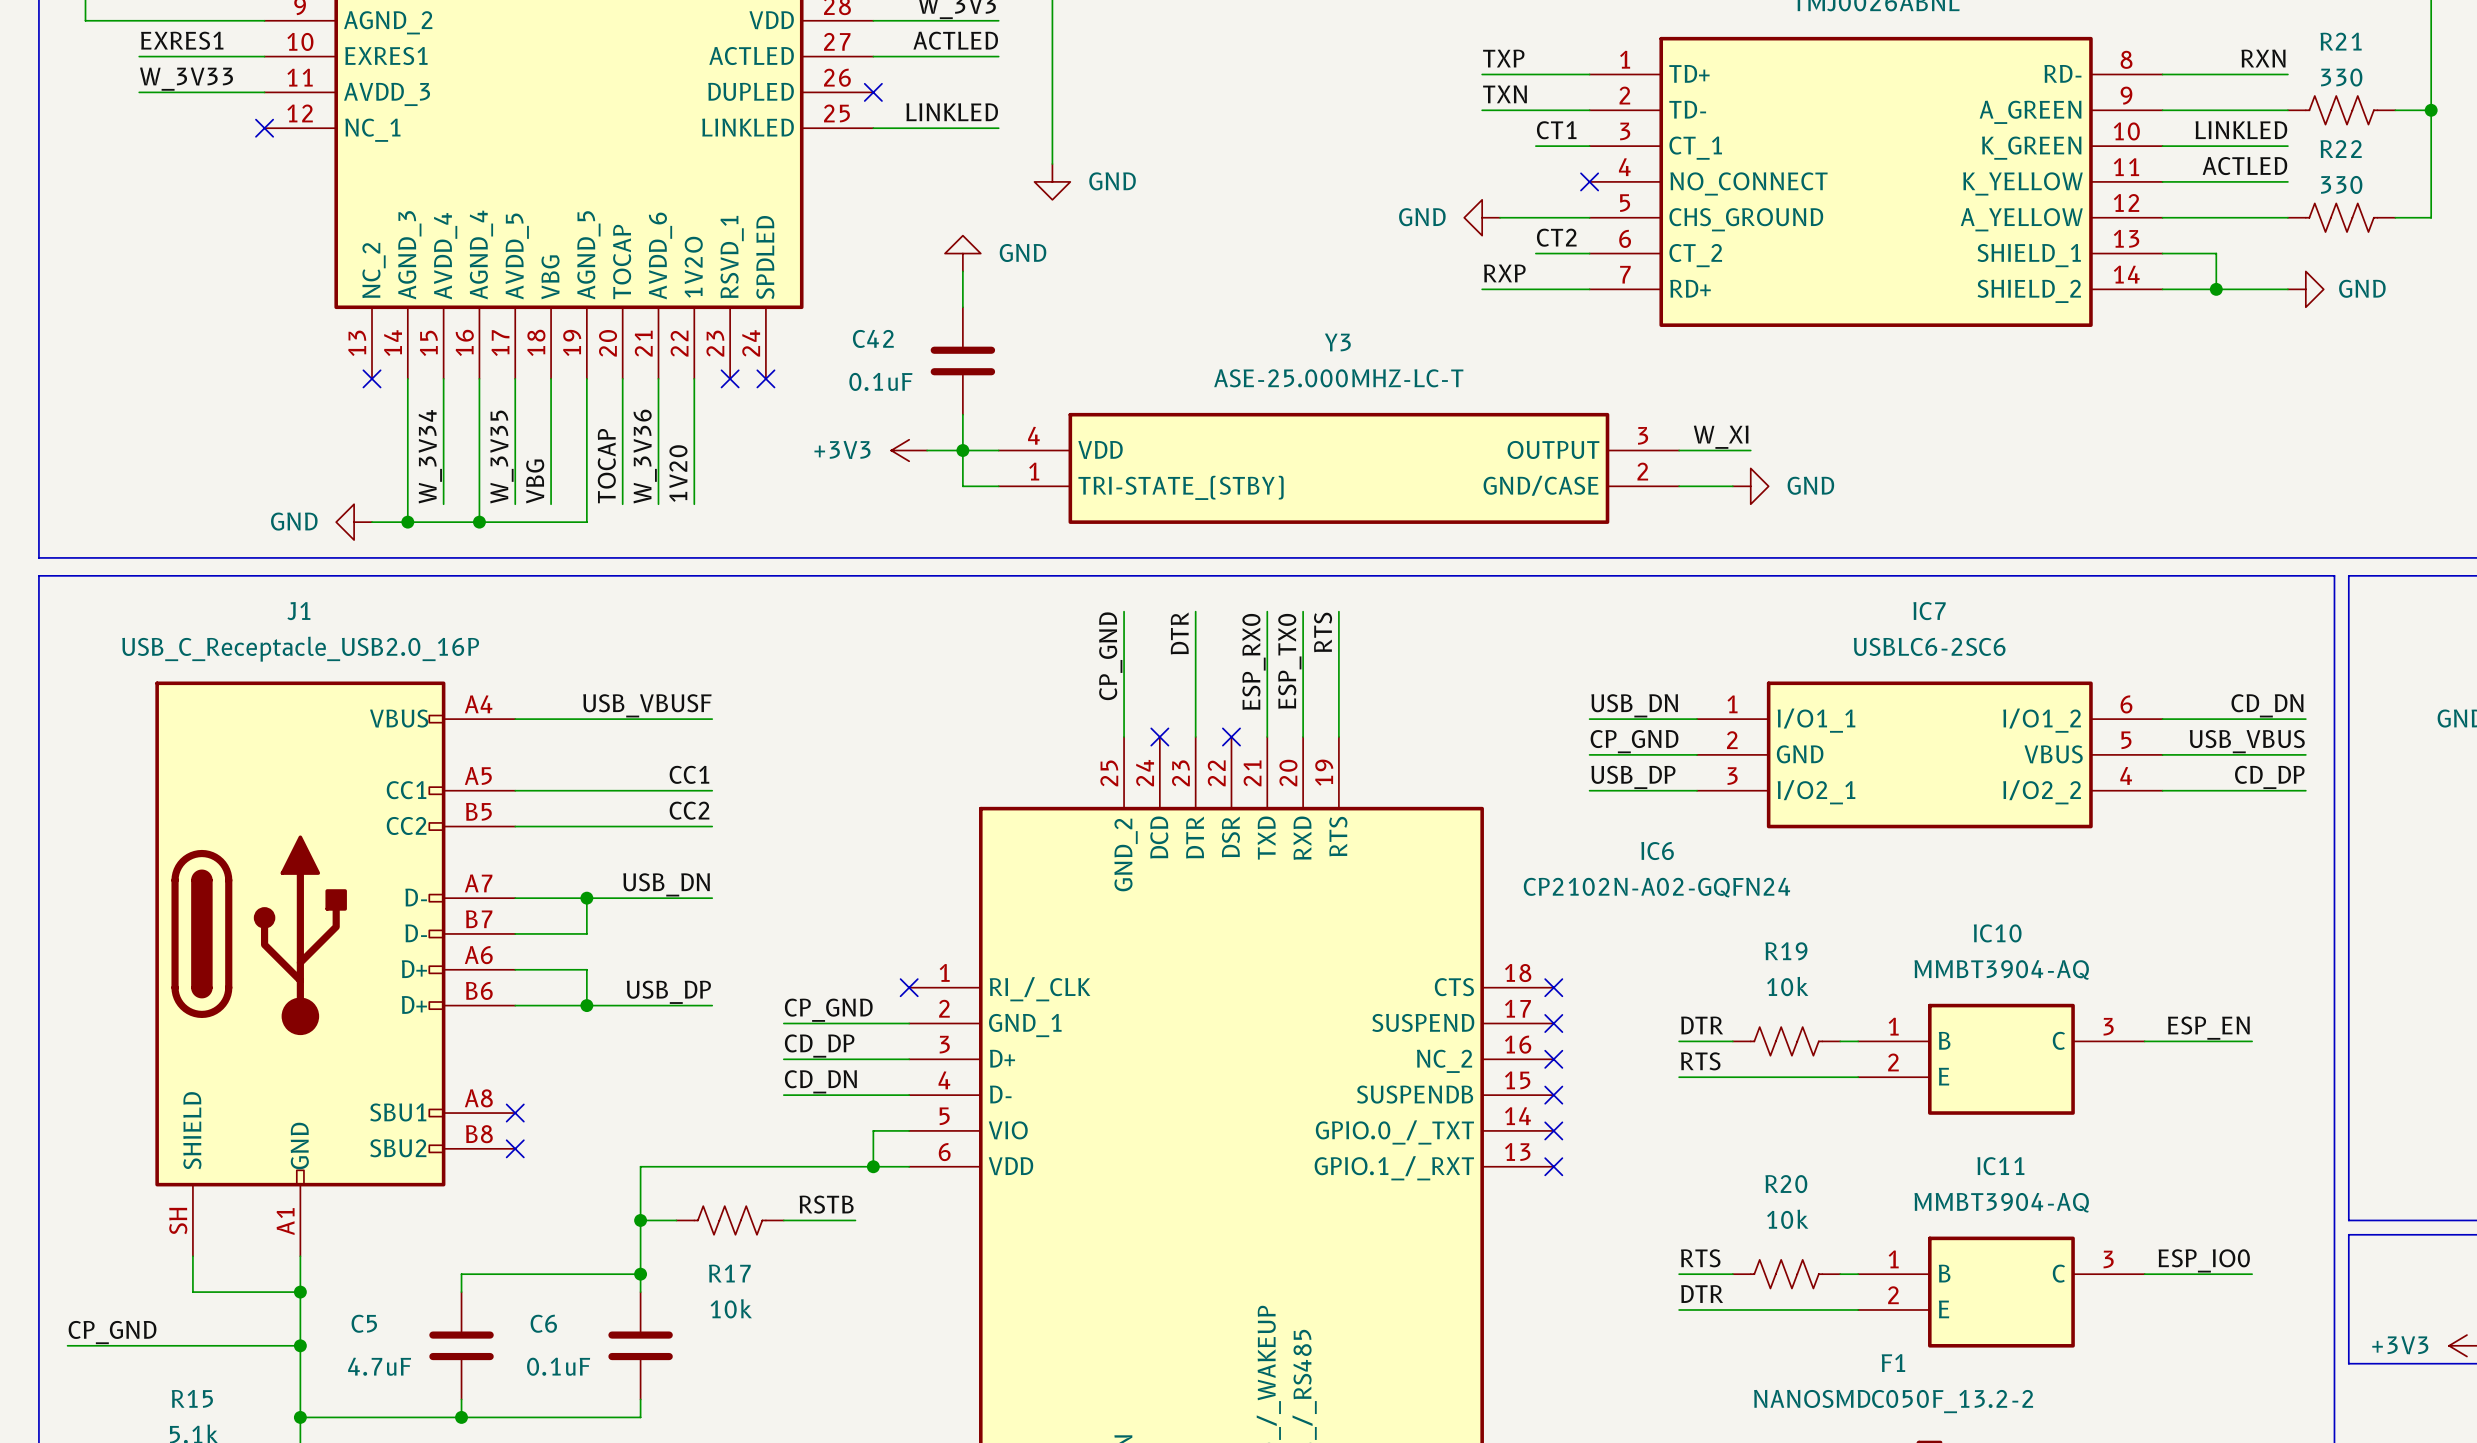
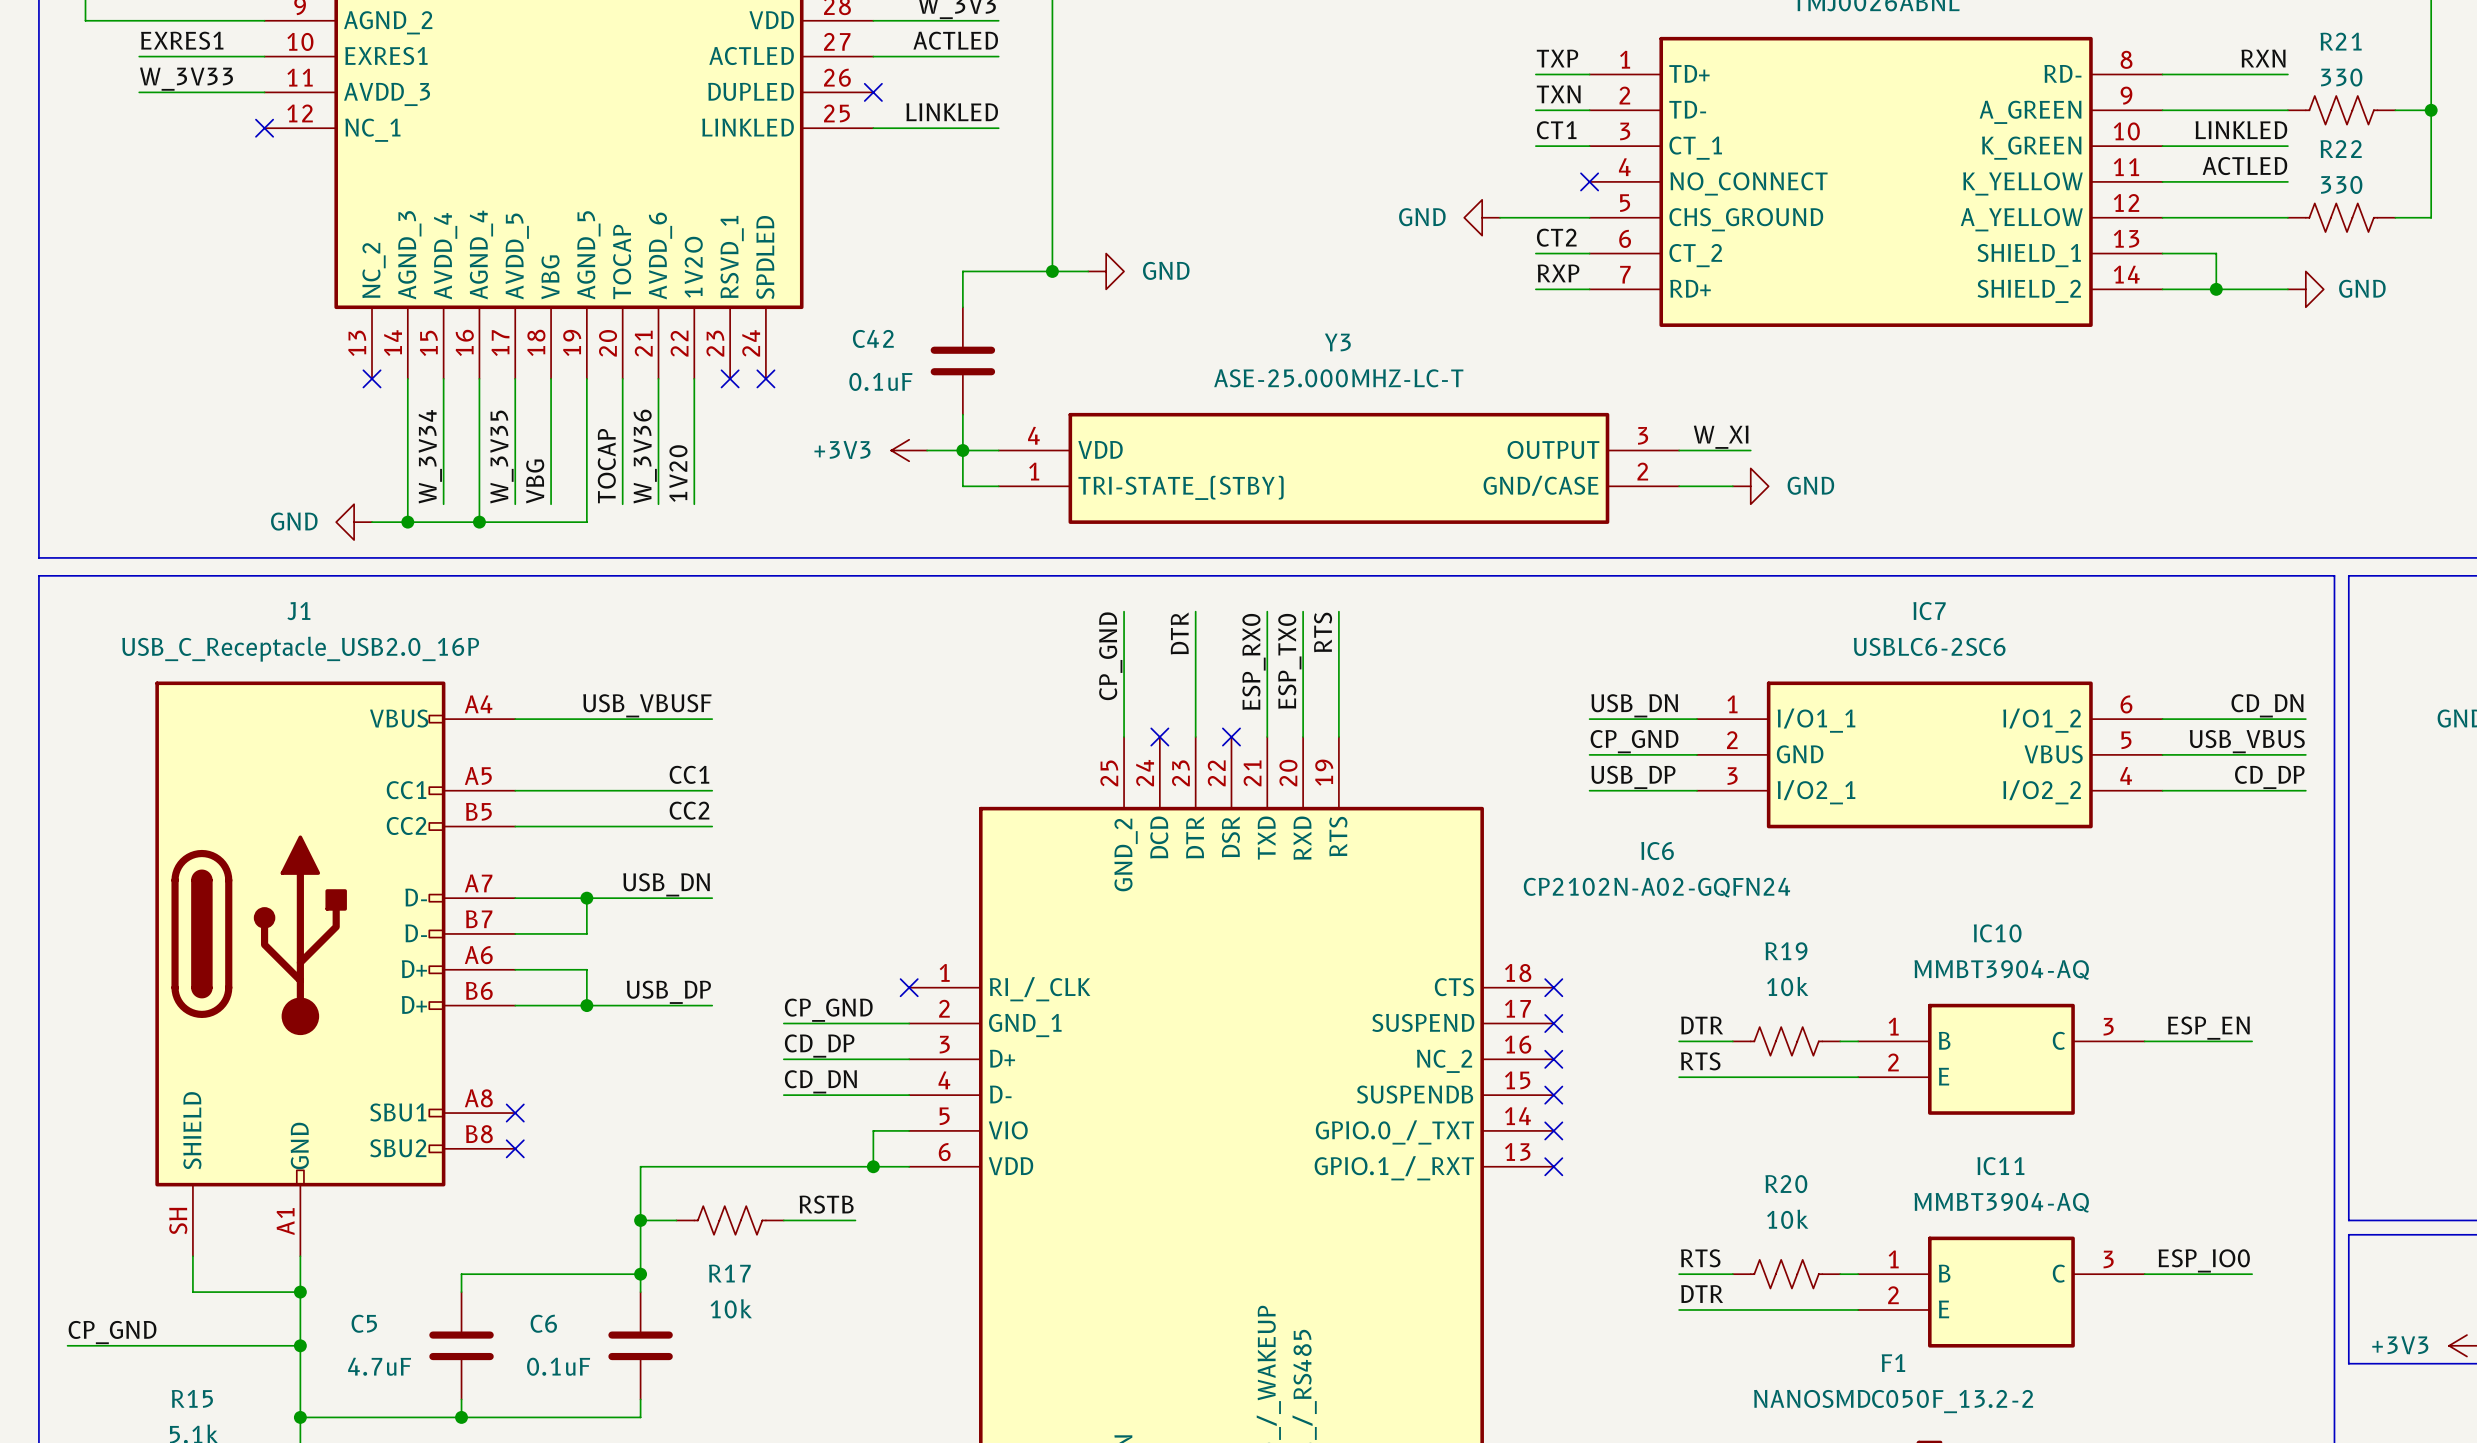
label position: TXP (1503, 58) -> TXP (1557, 58)
wire: (1482, 74) (1535, 74) -> none
label position: TXN (1504, 94) -> TXN (1558, 94)
wire: (1482, 110) (1535, 110) -> none
wire: none -> (1052, 164) (1052, 271)
power symbol: GND (1052, 181) -> none
power symbol: GND (962, 253) -> none
wire: none -> (962, 271) (1088, 271)
junction: none -> (1052, 271)
power symbol: none -> GND (1106, 271)
label position: RXP (1504, 273) -> RXP (1558, 273)
wire: (1482, 289) (1535, 289) -> none

